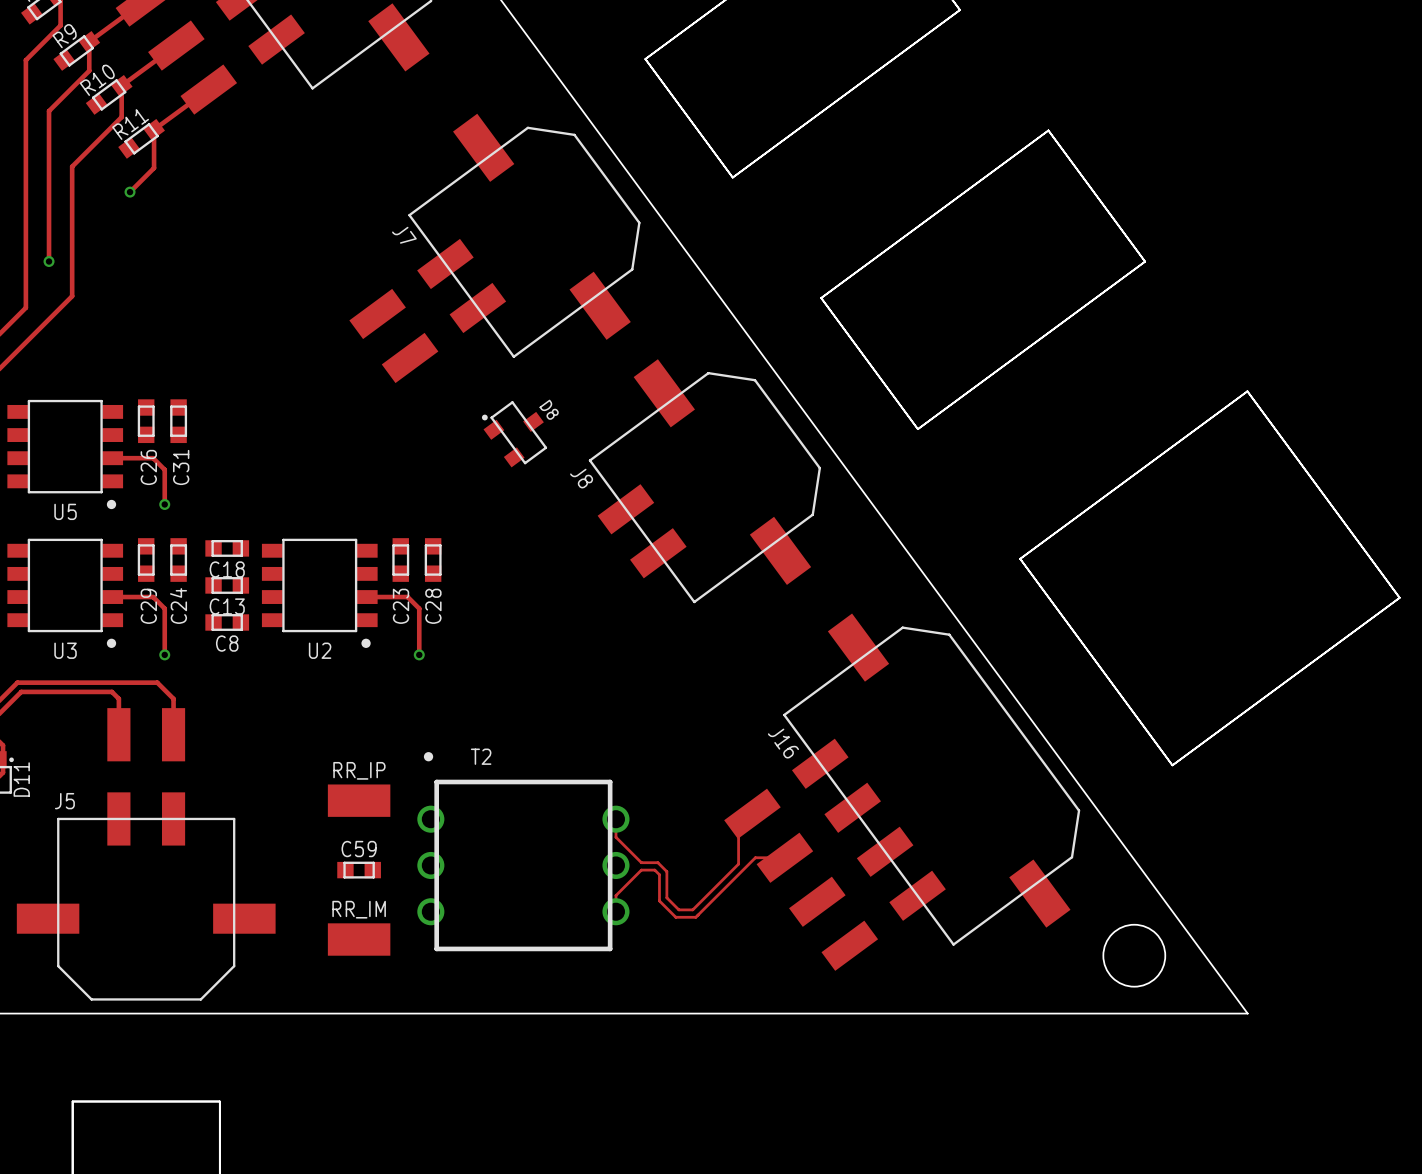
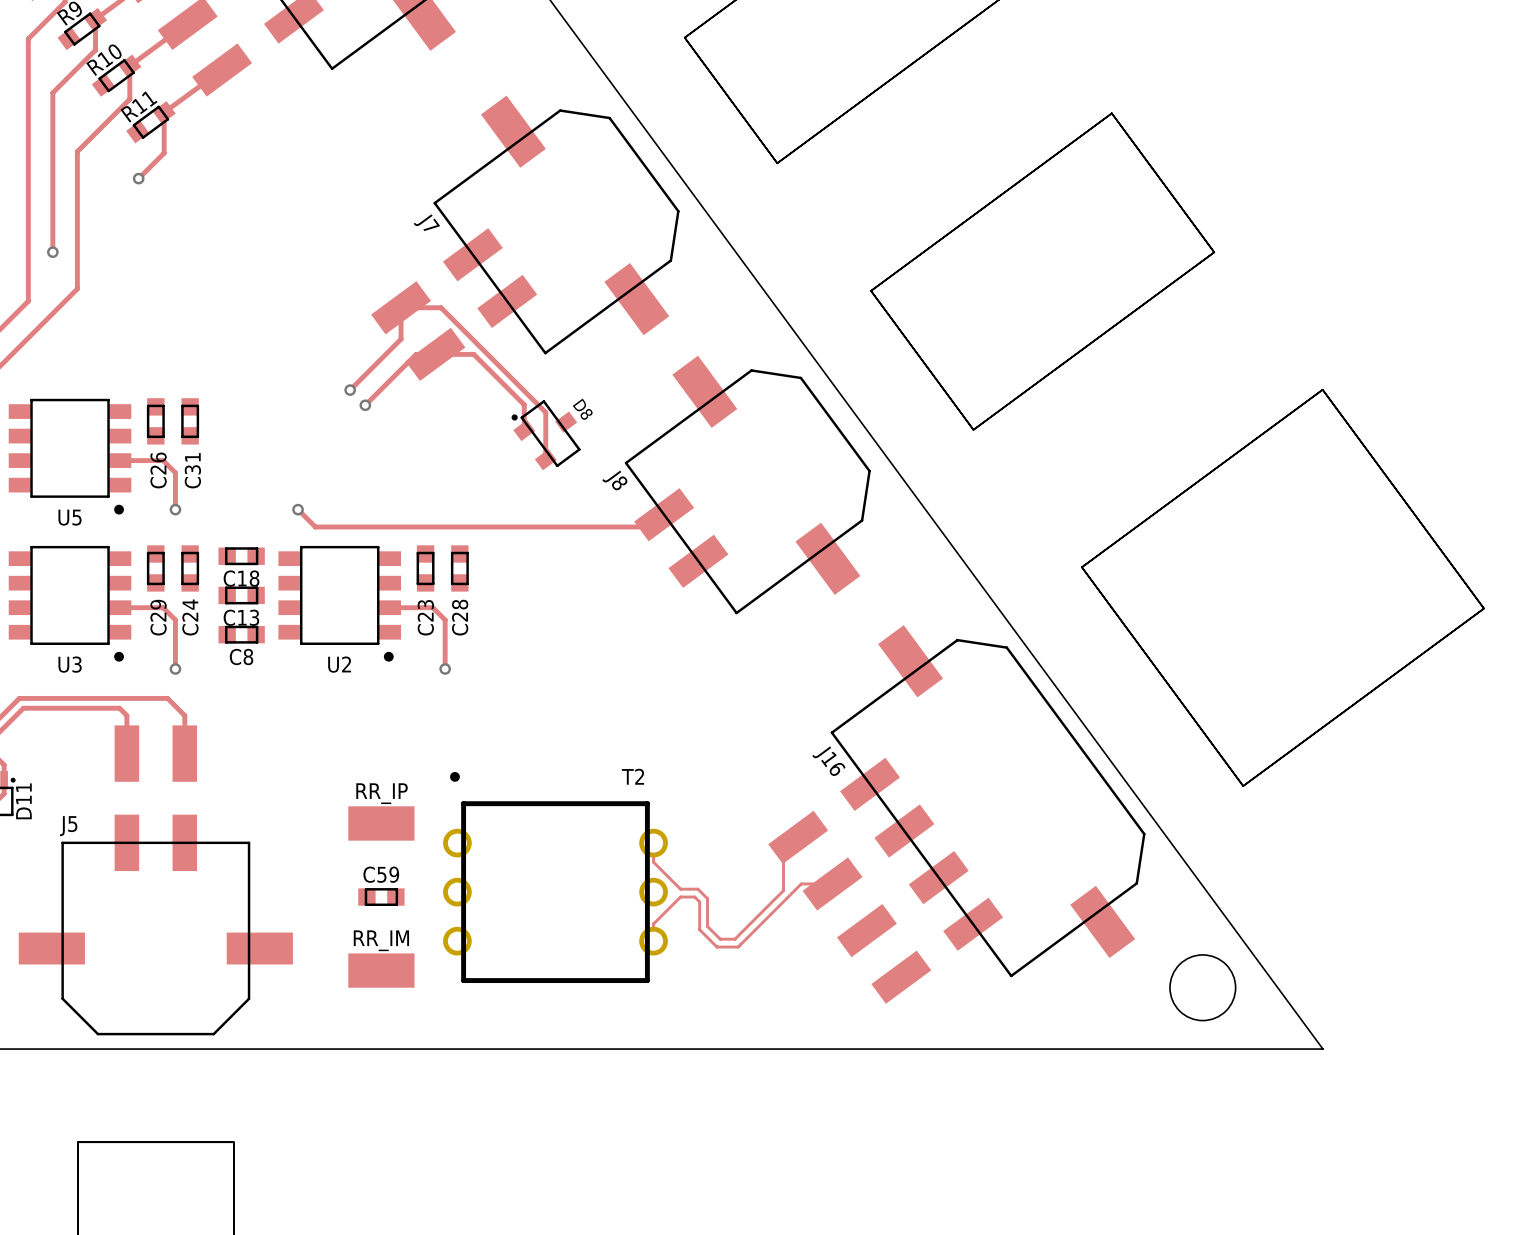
track: none -> (350, 390) (401, 339) (401, 307) (441, 307) (545, 412) (545, 459)
via: none -> (350, 390)
track: none -> (365, 405) (416, 354) (473, 354) (524, 404) (524, 430)
via: none -> (365, 405)
track: none -> (298, 509) (315, 526) (651, 526) (664, 514)
via: none -> (298, 509)
T2 name position: T2 (481, 756) -> T2 (632, 776)

